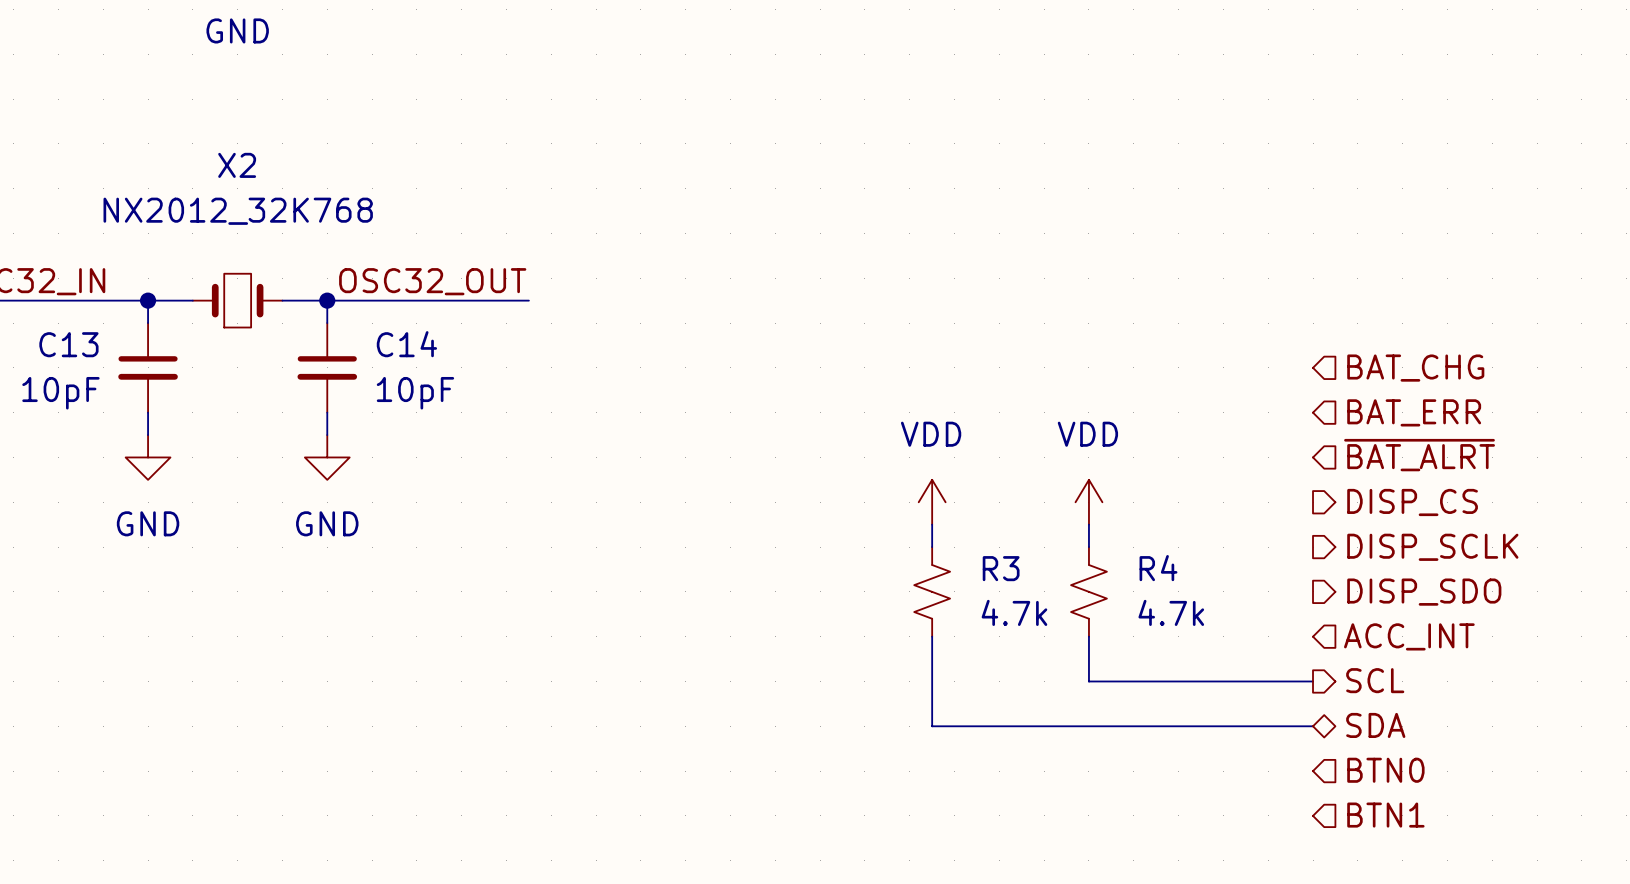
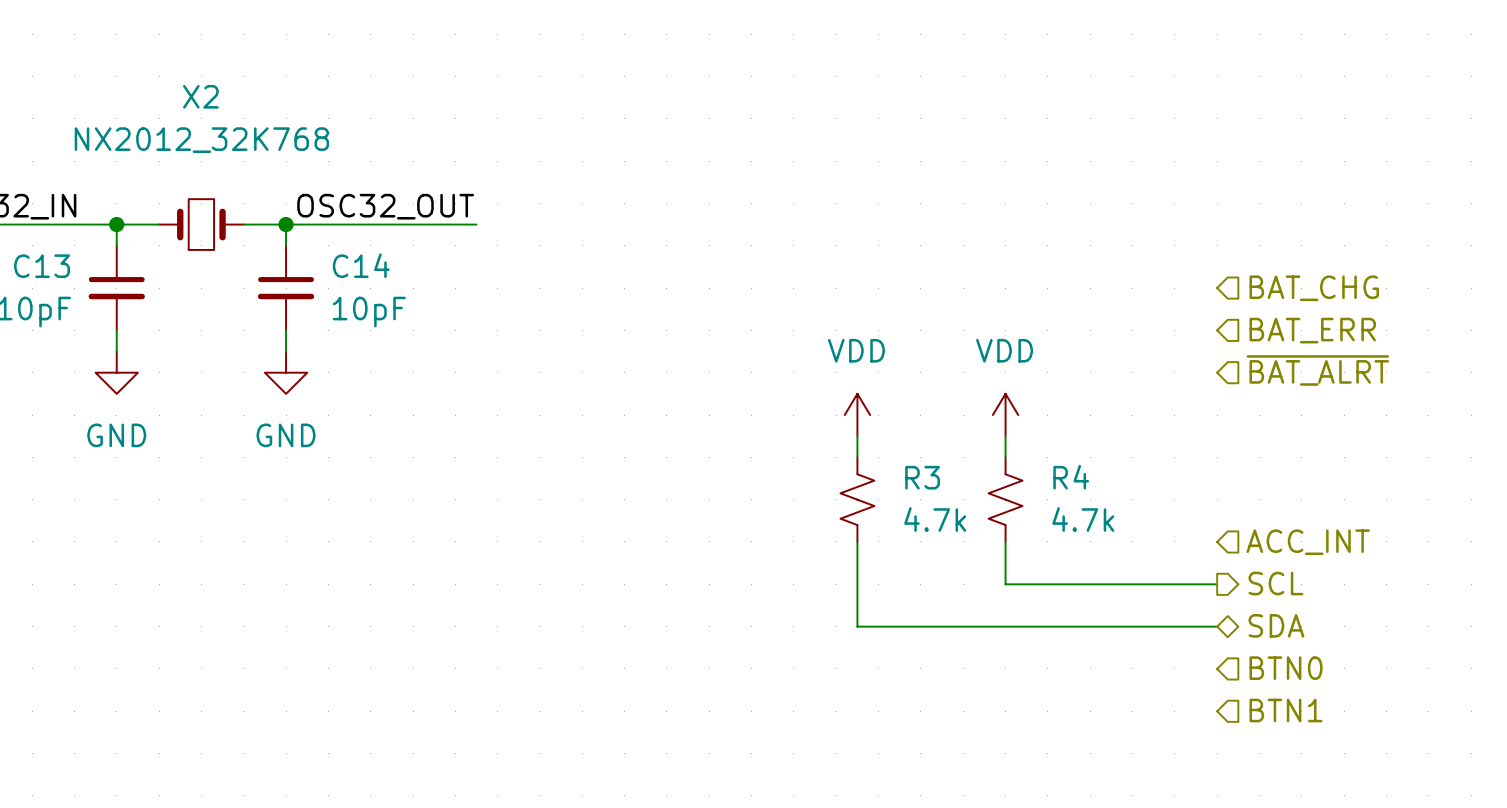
hierarchical label: DISP_CS (1412, 502) -> none
hierarchical label: DISP_SCLK (1432, 547) -> none
hierarchical label: DISP_SDO (1424, 592) -> none

